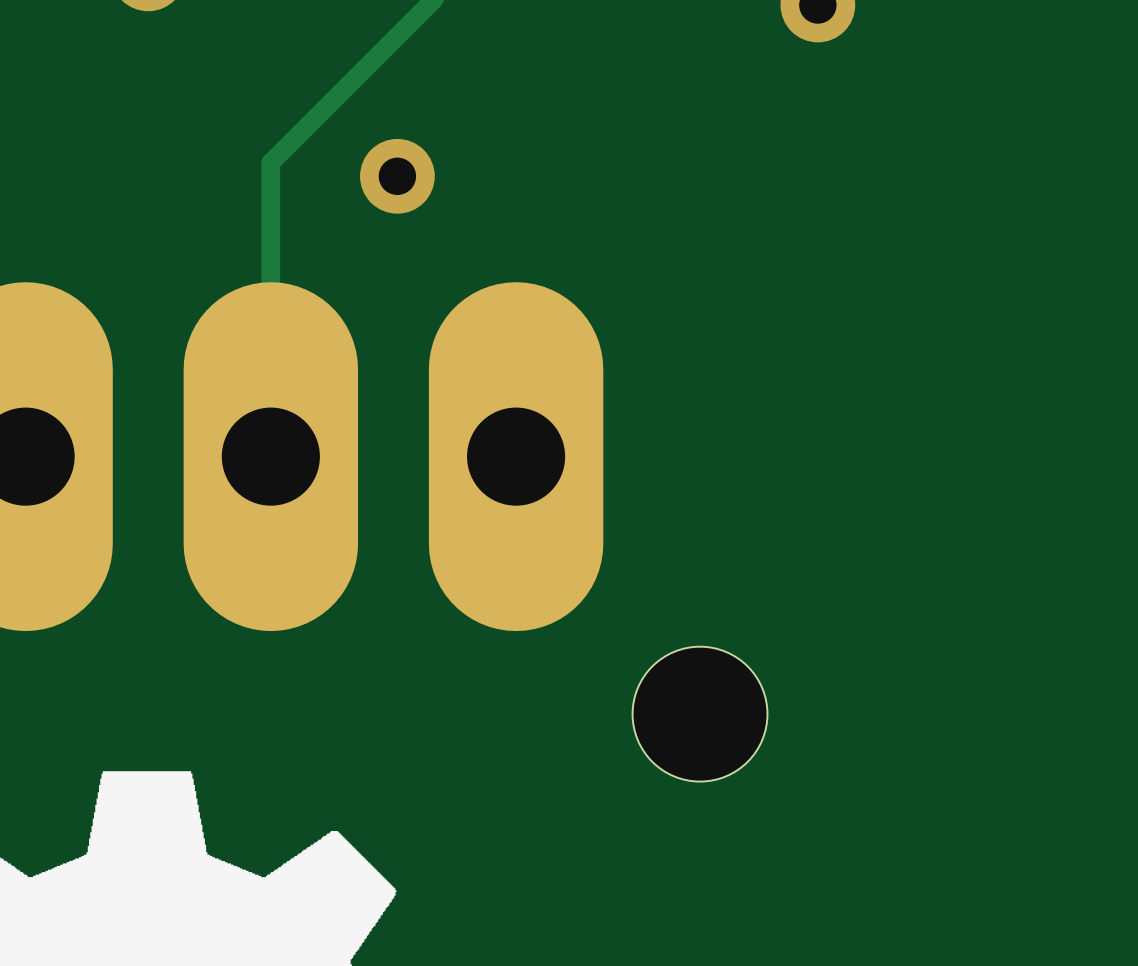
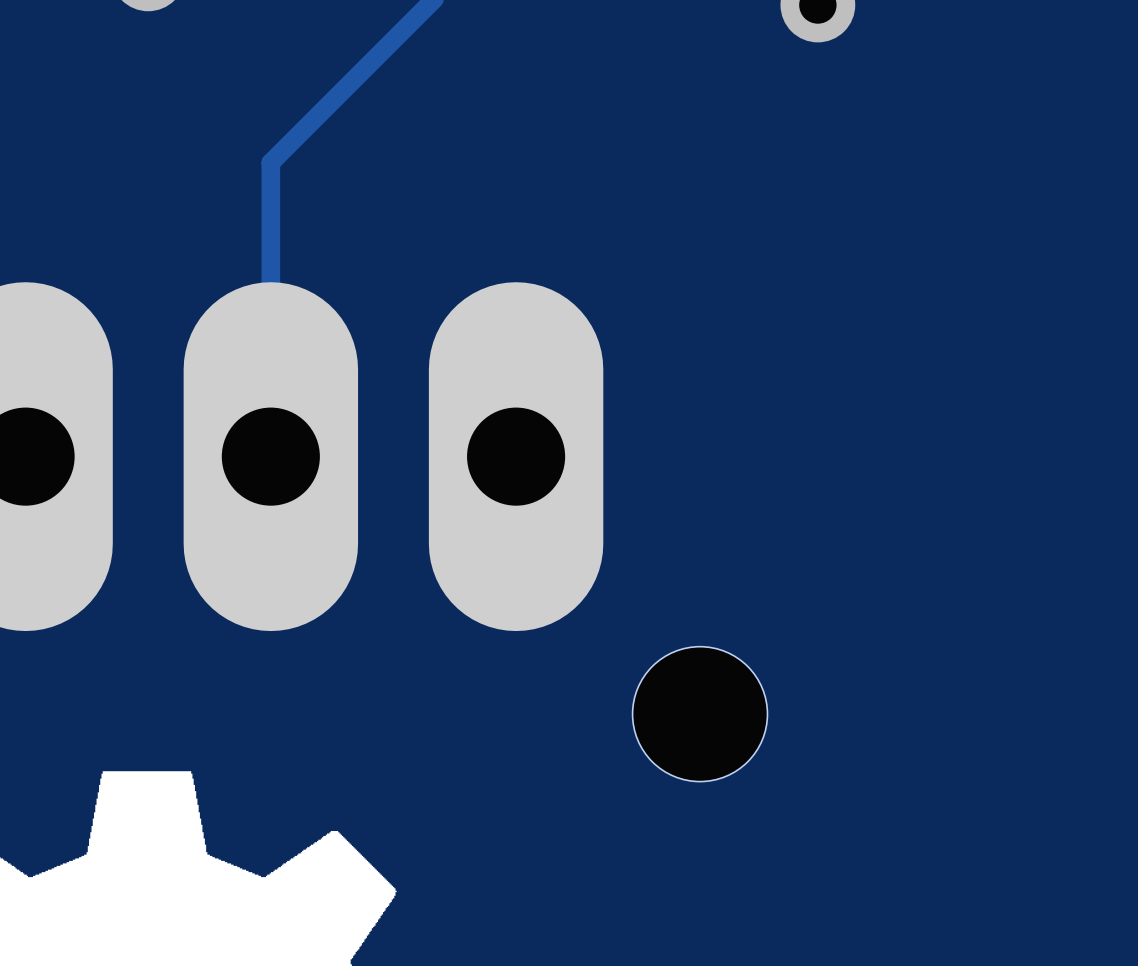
via: (397, 176) -> none

